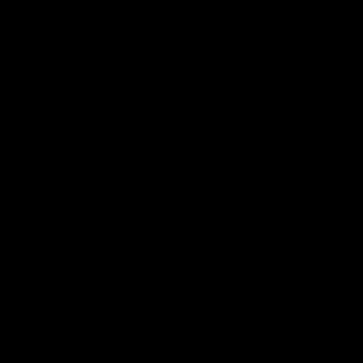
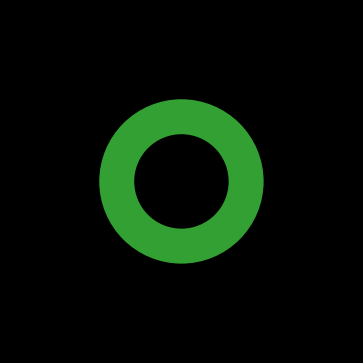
part: none -> (181, 181)

